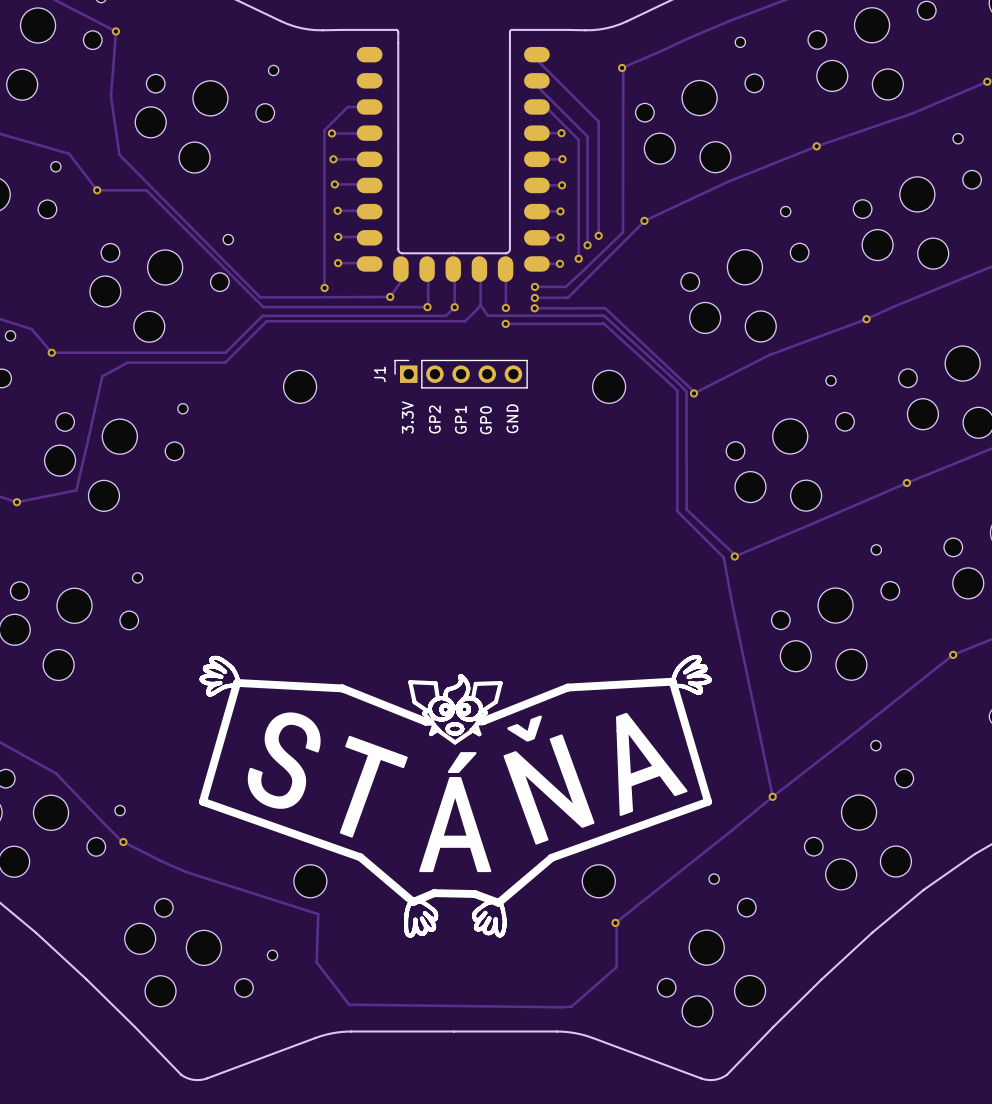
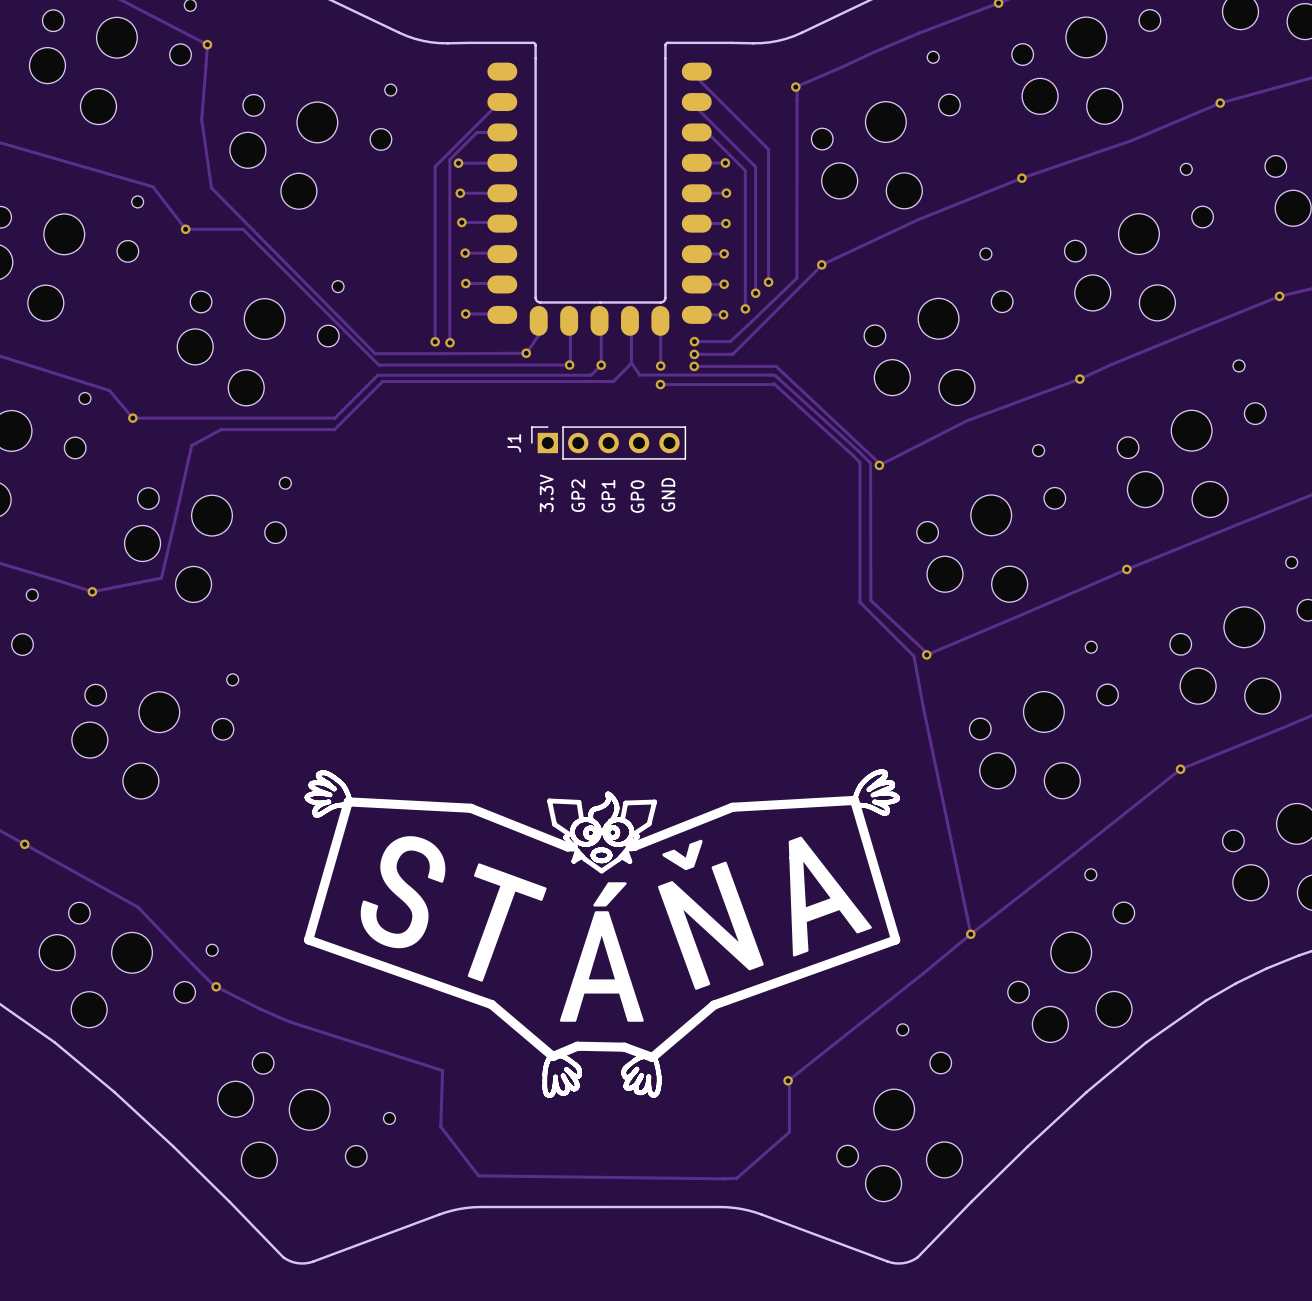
track: none -> (499, 102) (435, 166) (435, 341)
via: none -> (435, 341)
part: (300, 386) -> none
part: (609, 386) -> none
part: (310, 881) -> none
part: (598, 881) -> none

